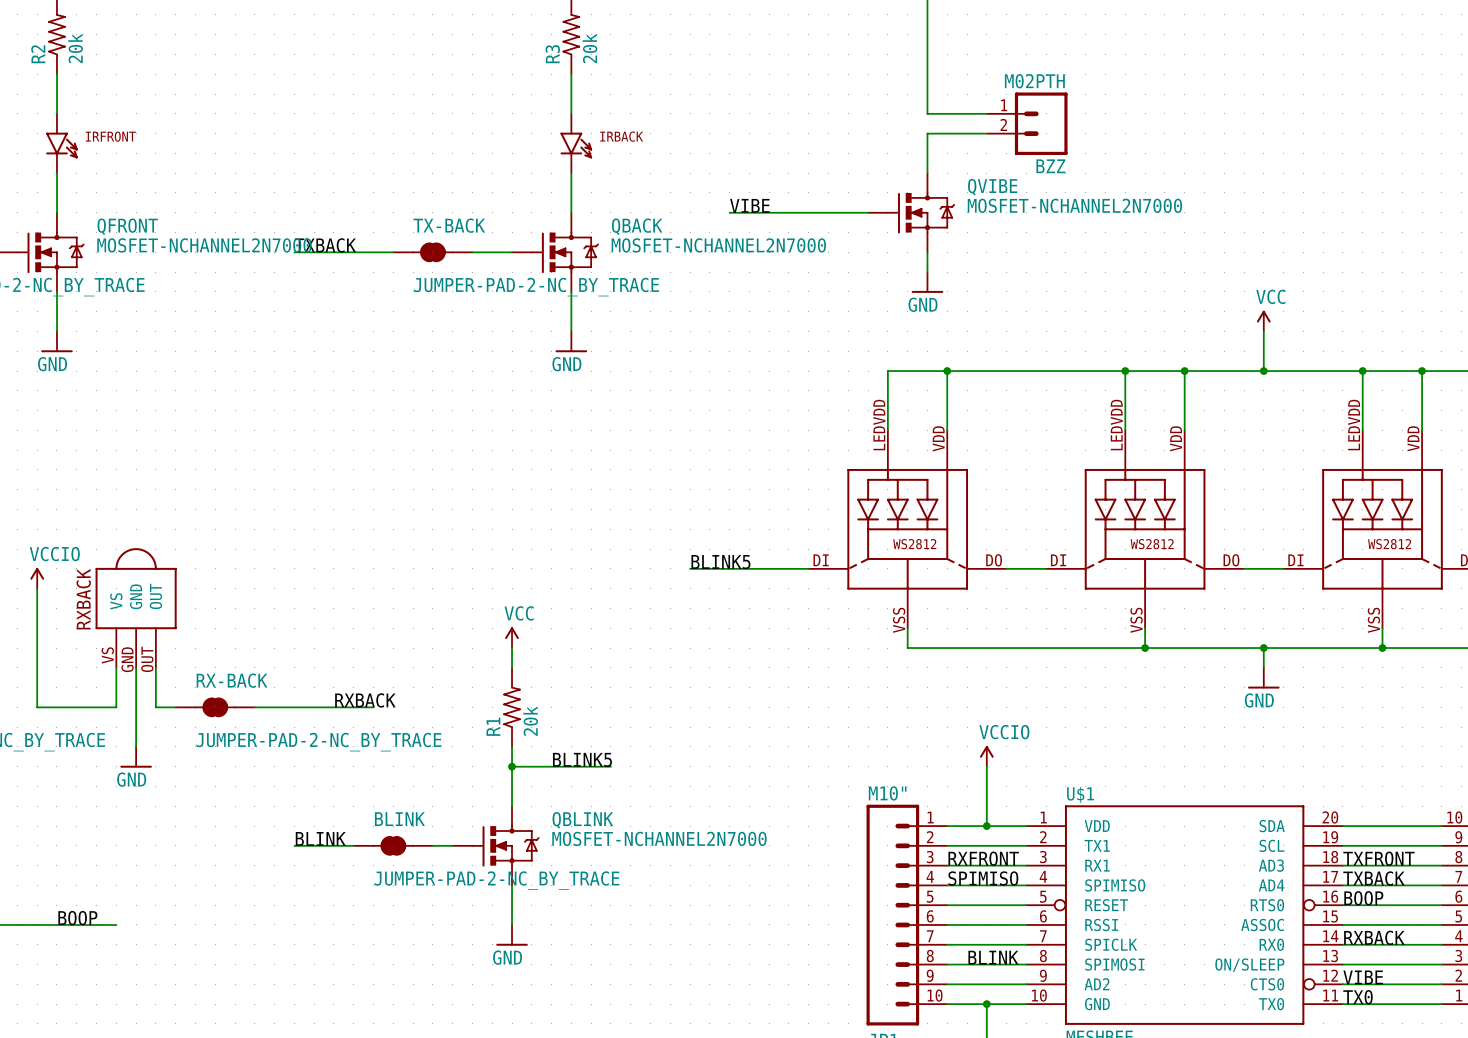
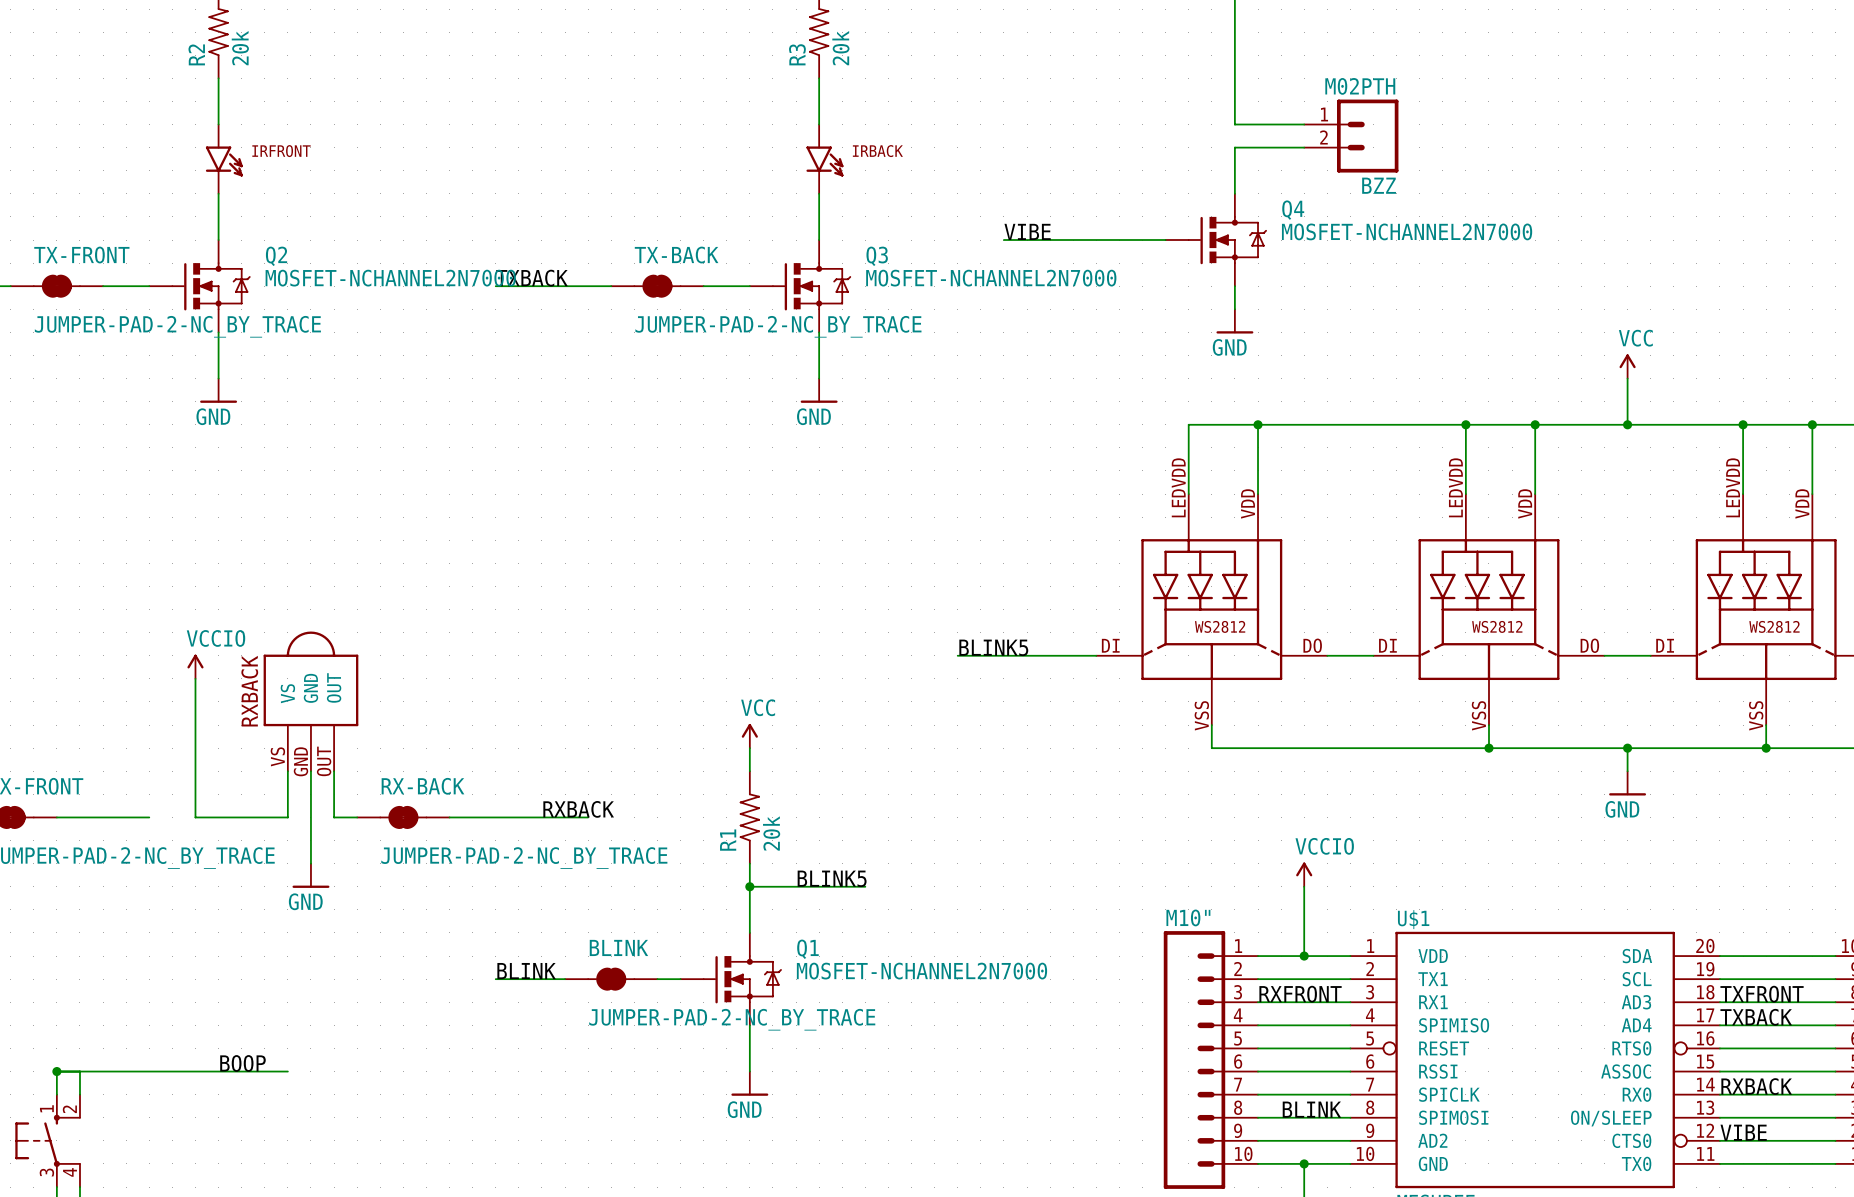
QVIBE name: QVIBE (992, 187) -> Q4 (1293, 210)
QFRONT name: QFRONT (127, 226) -> Q2 (276, 256)
QBACK name: QBACK (637, 226) -> Q3 (877, 256)
QBLINK name: QBLINK (582, 820) -> Q1 (807, 949)
label: SPIMISO (983, 878) -> none
label: BOOP (1363, 898) -> none
label: TX0 (1358, 997) -> none

